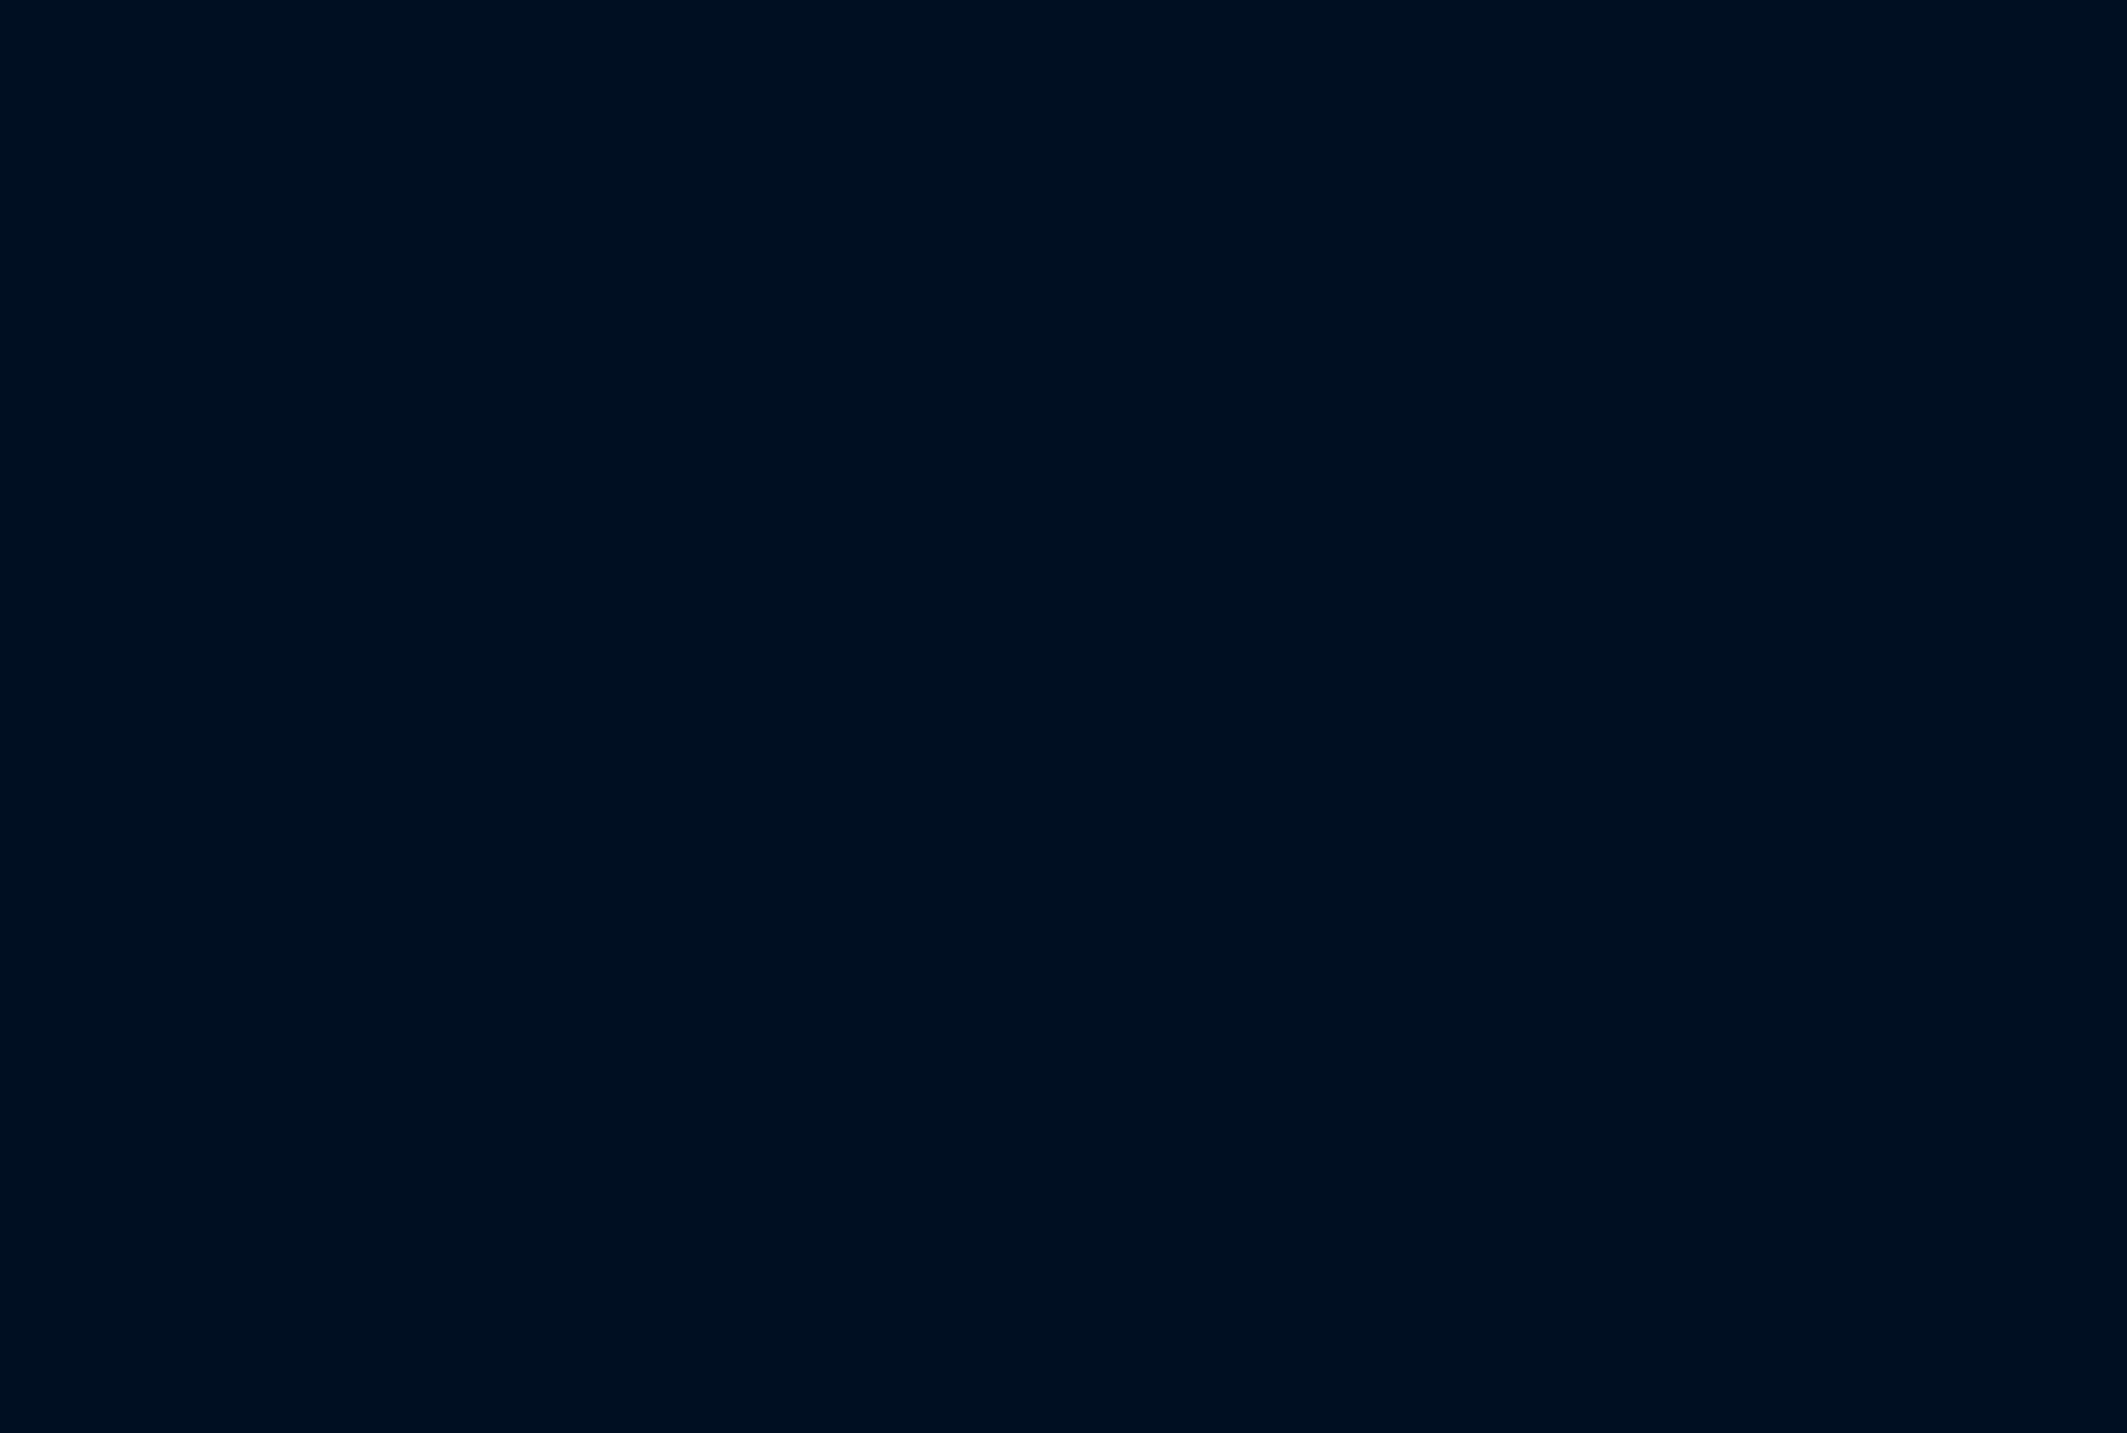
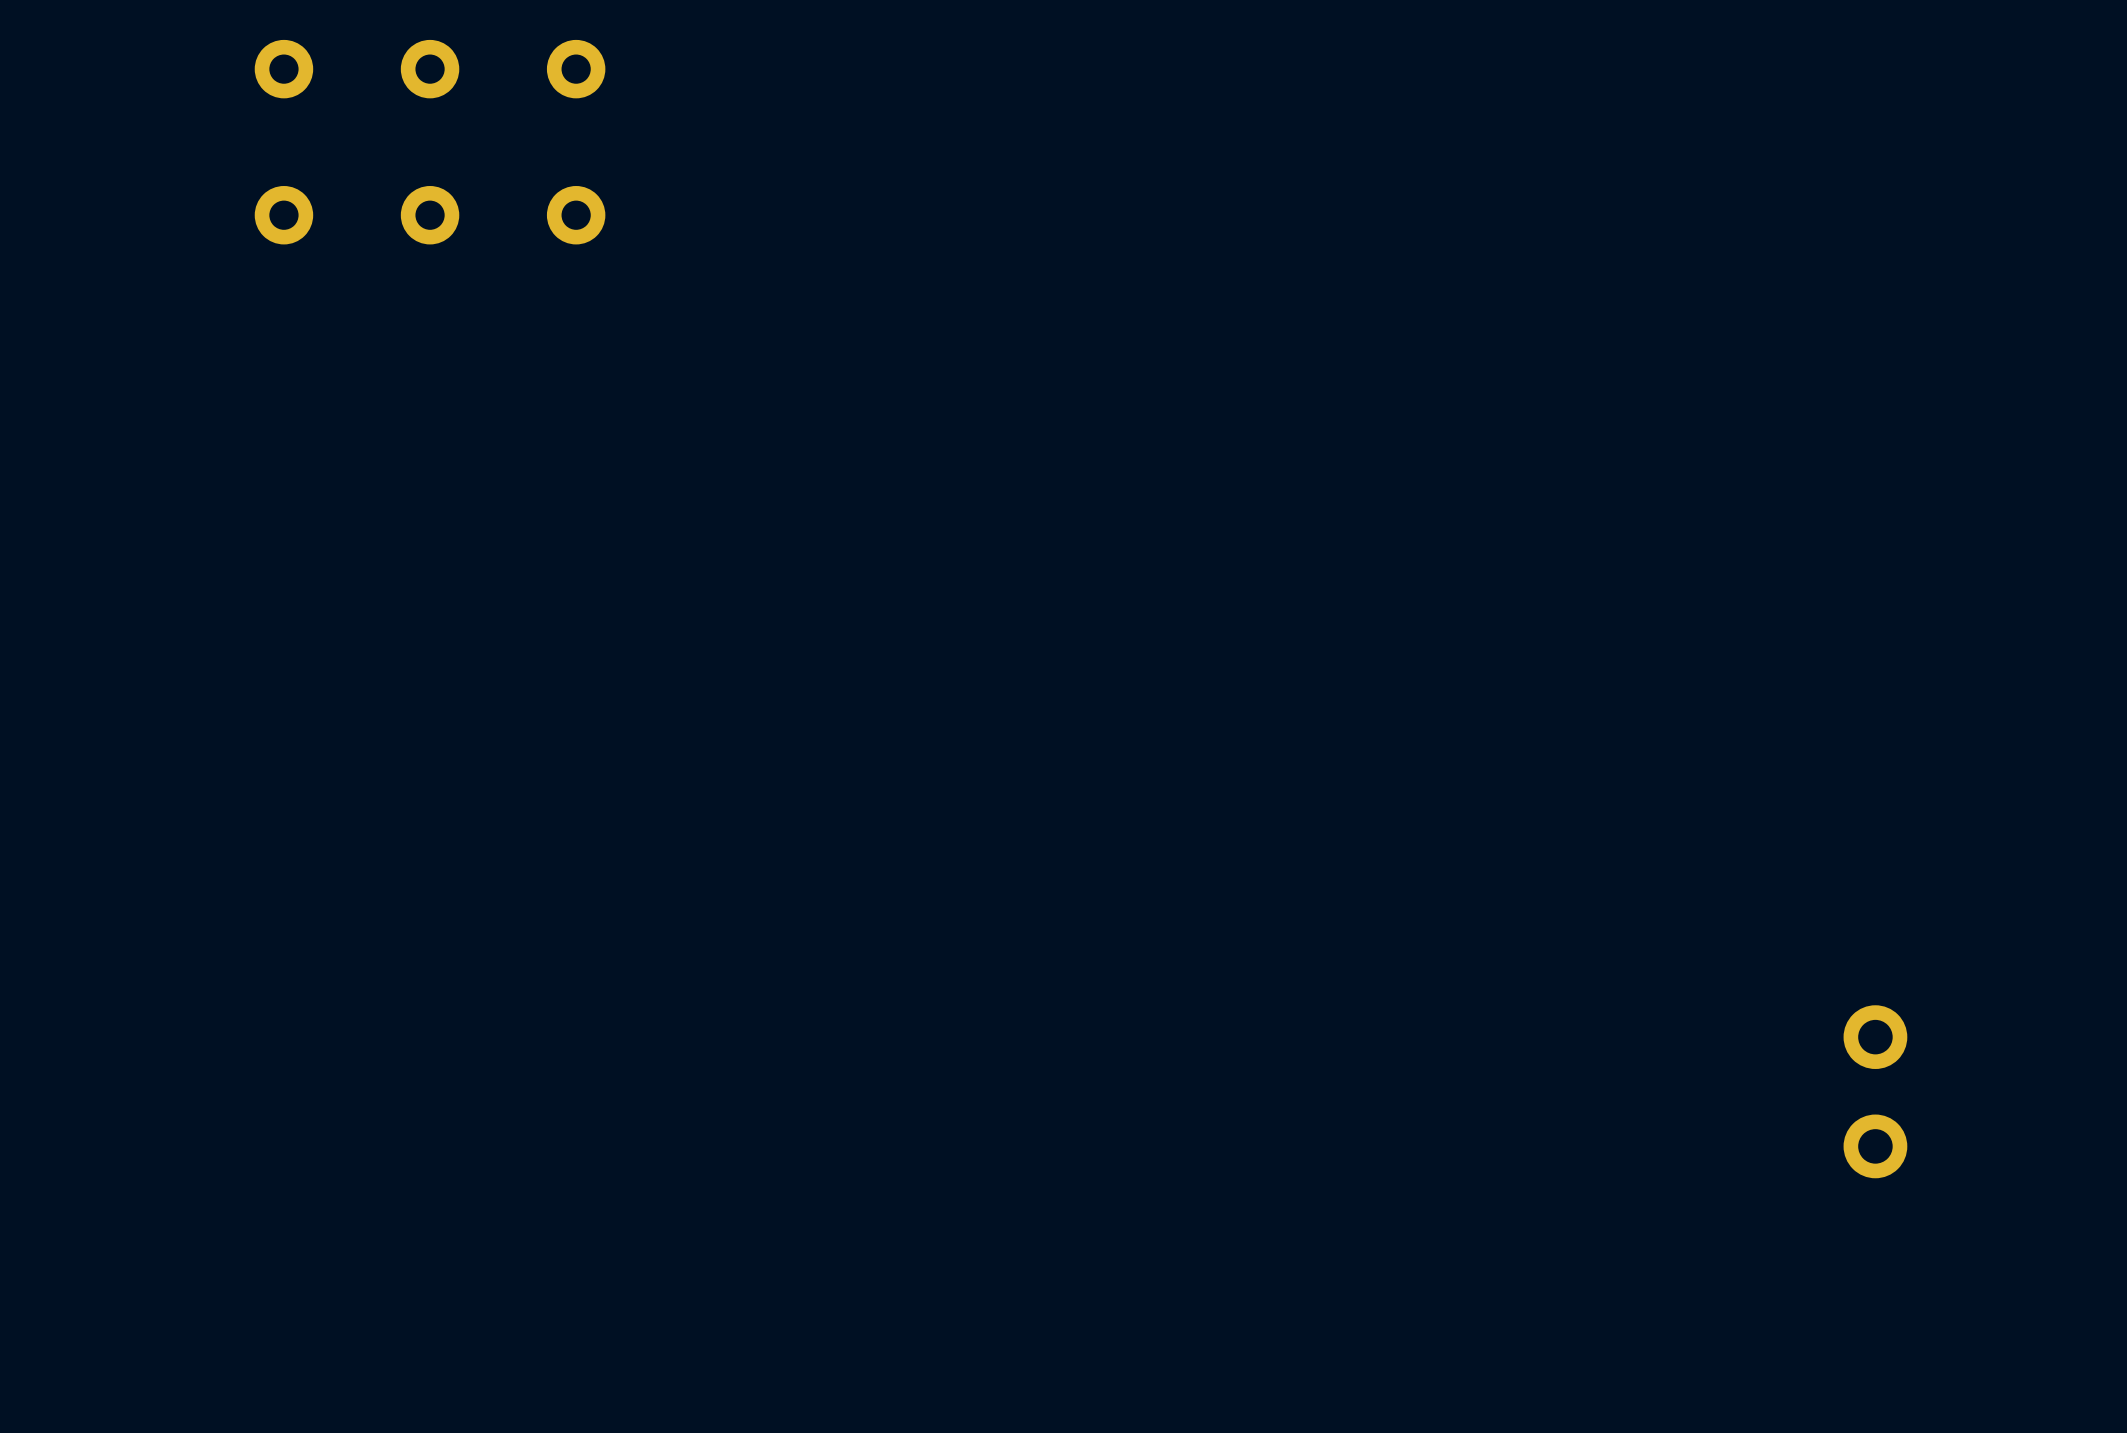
part: none -> (430, 142)
part: none -> (1875, 1091)

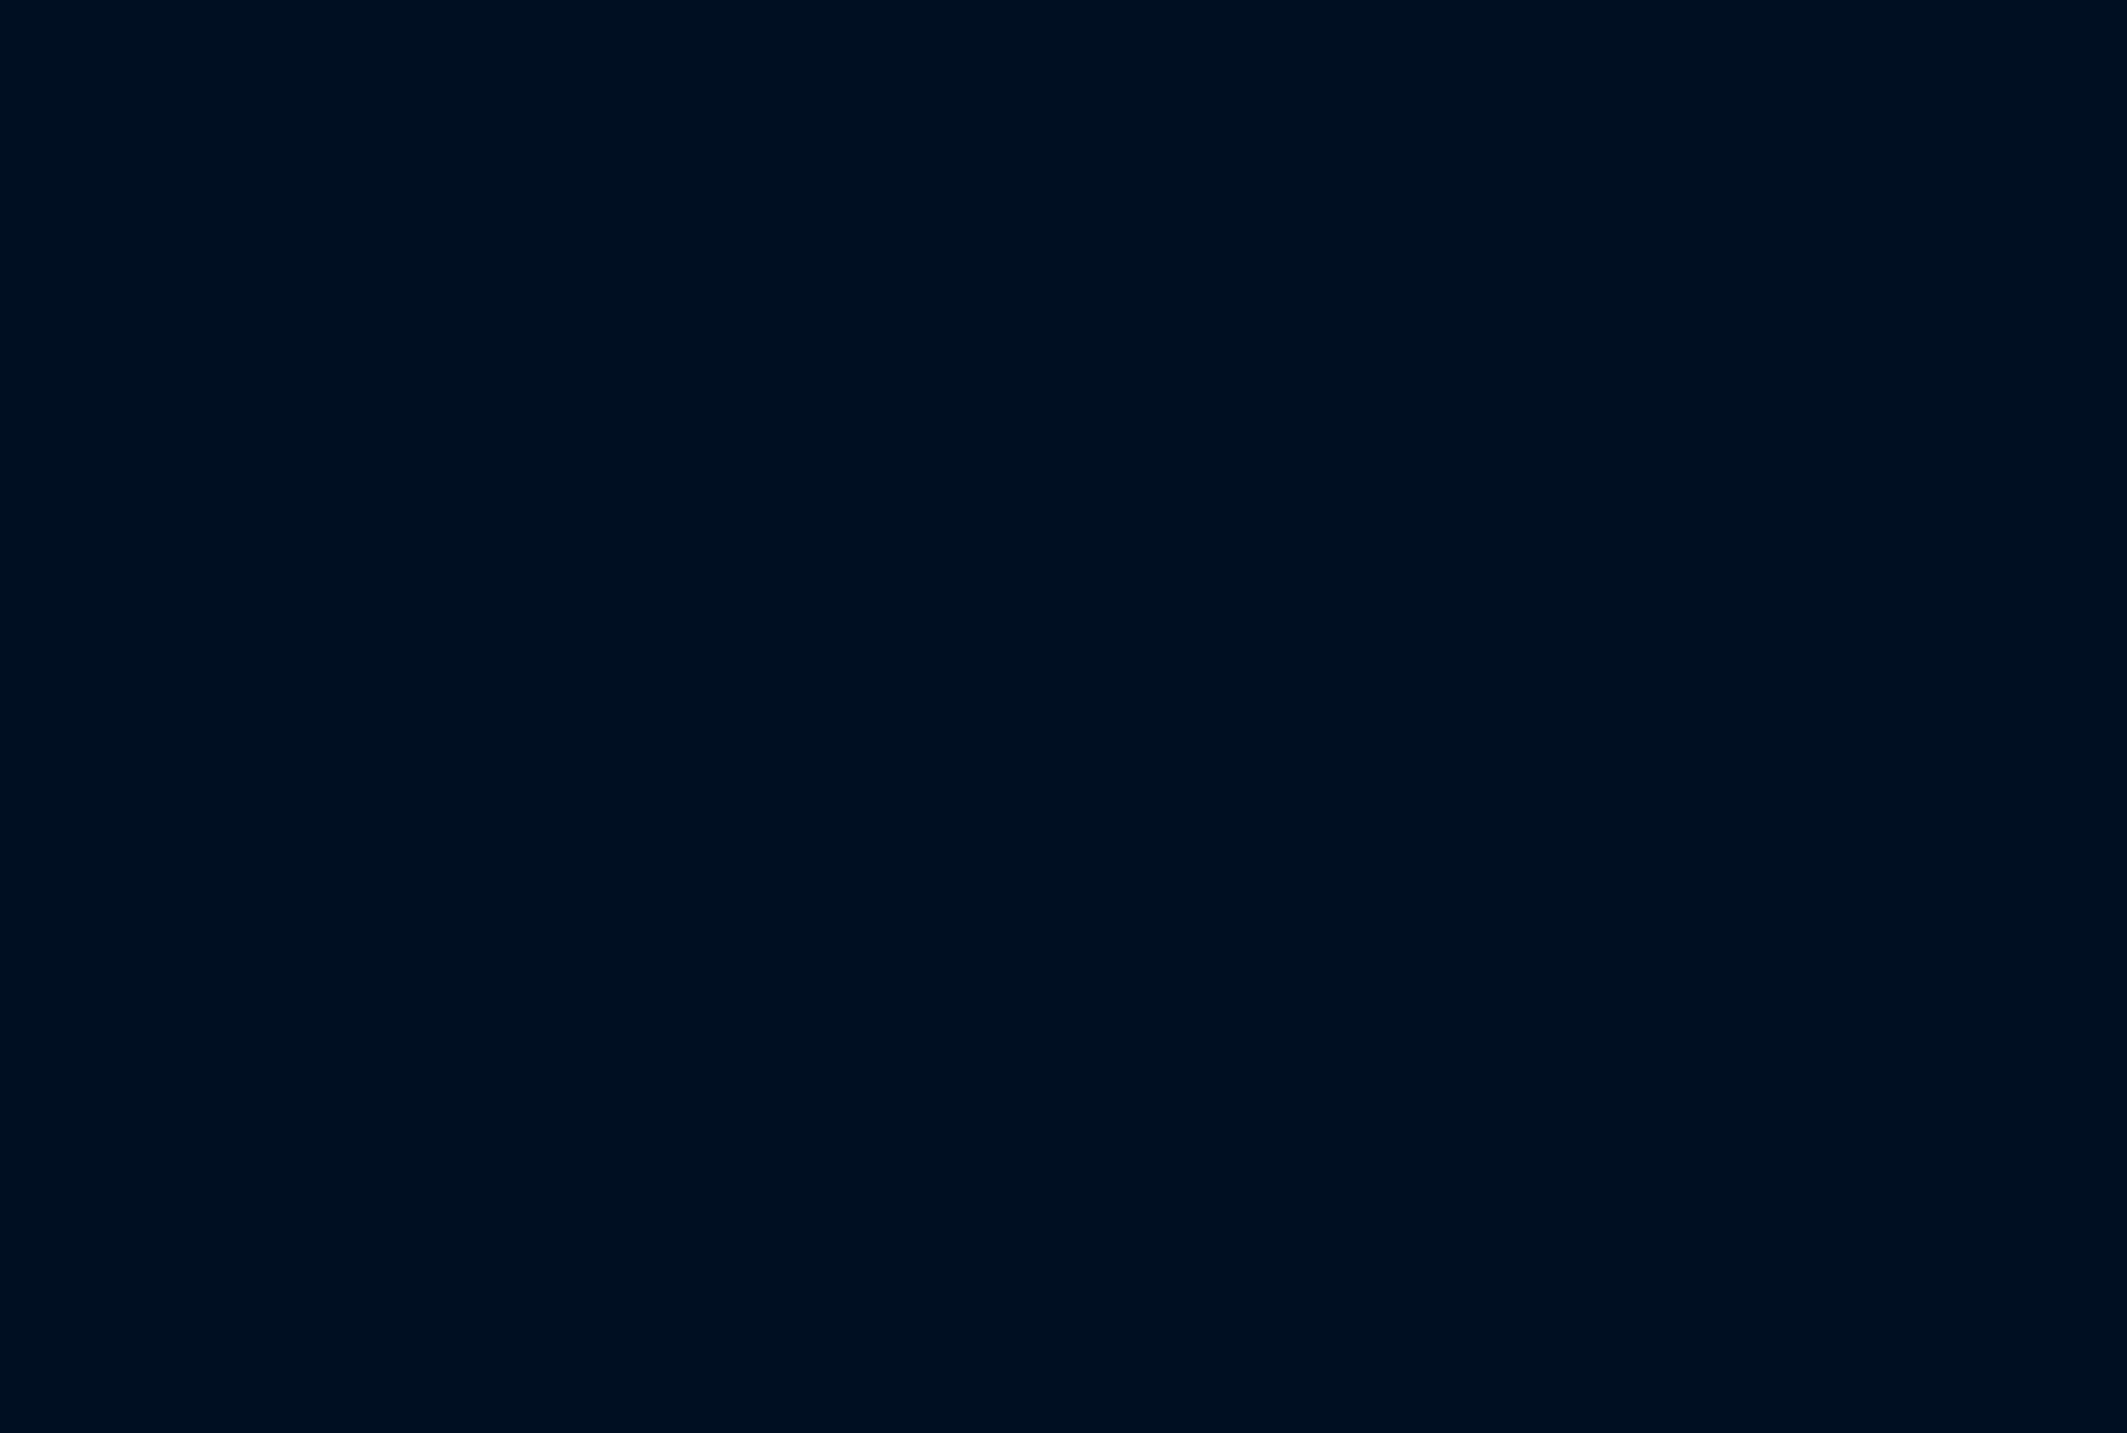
part: (430, 142) -> none
part: (1875, 1091) -> none

